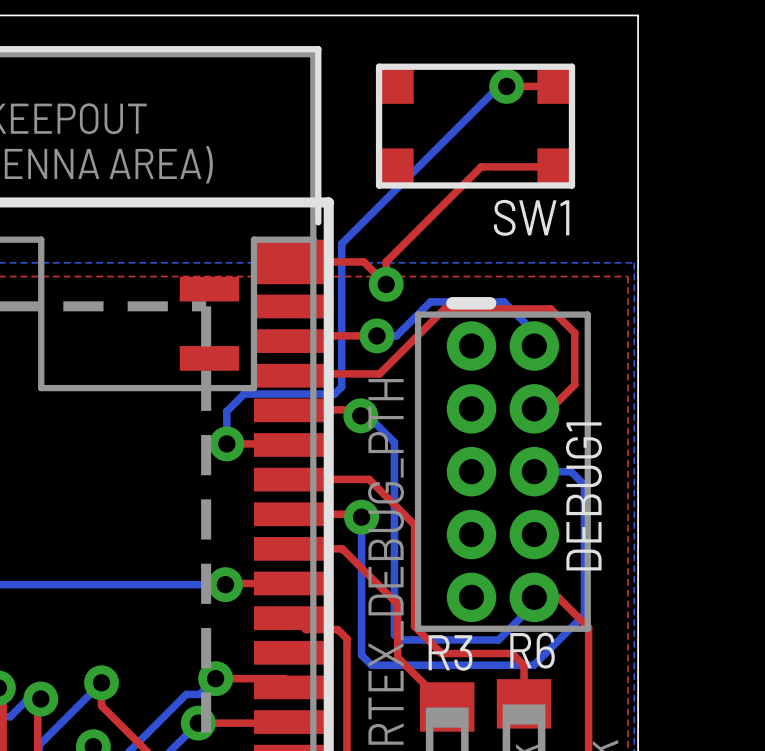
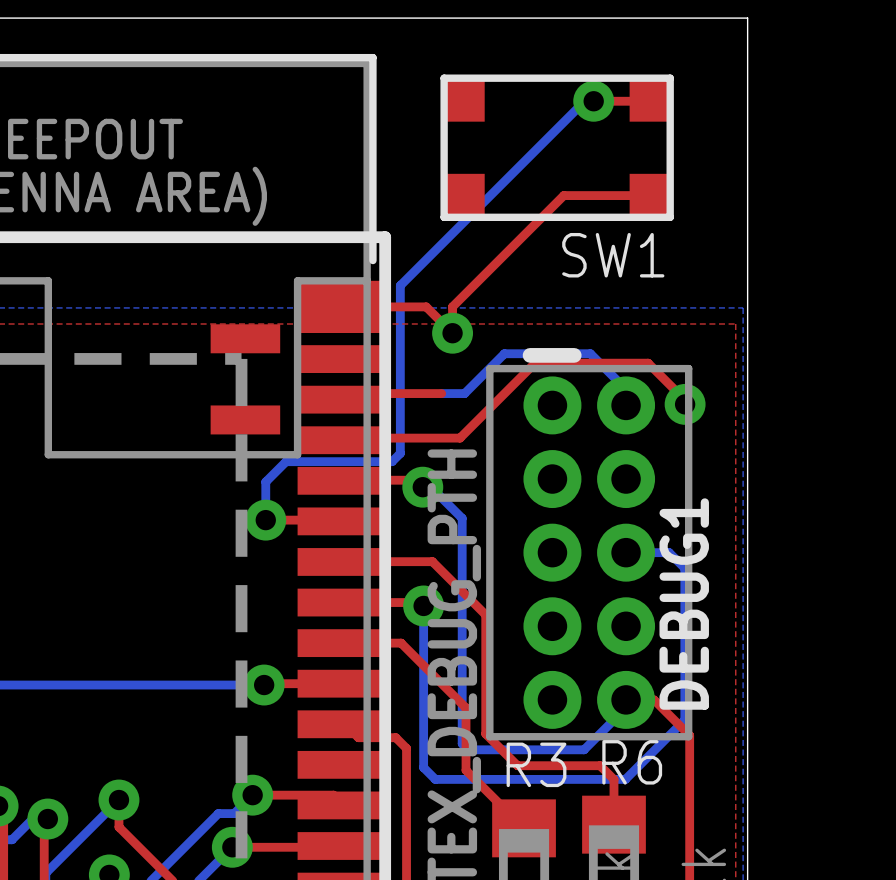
via position: (376, 335) -> (685, 404)
top track: (379, 373) (444, 308) (550, 308) (574, 332) (574, 384) (550, 408) (534, 408) -> (444, 438) (460, 438) (534, 363) (648, 363) (685, 400) (685, 404)

